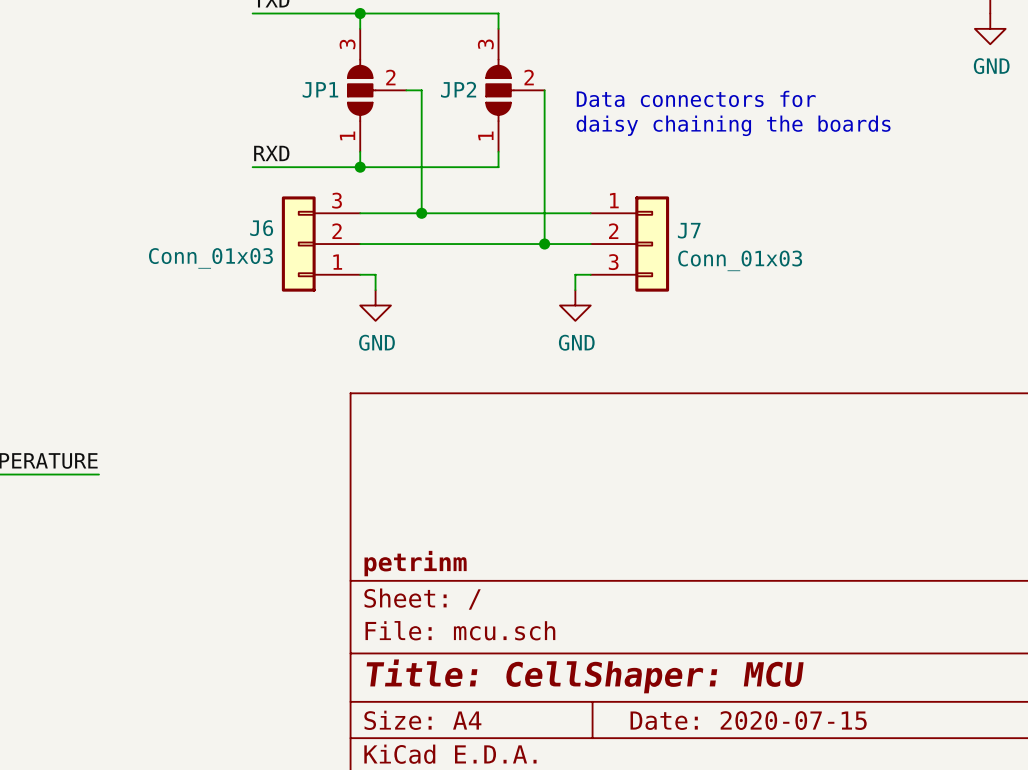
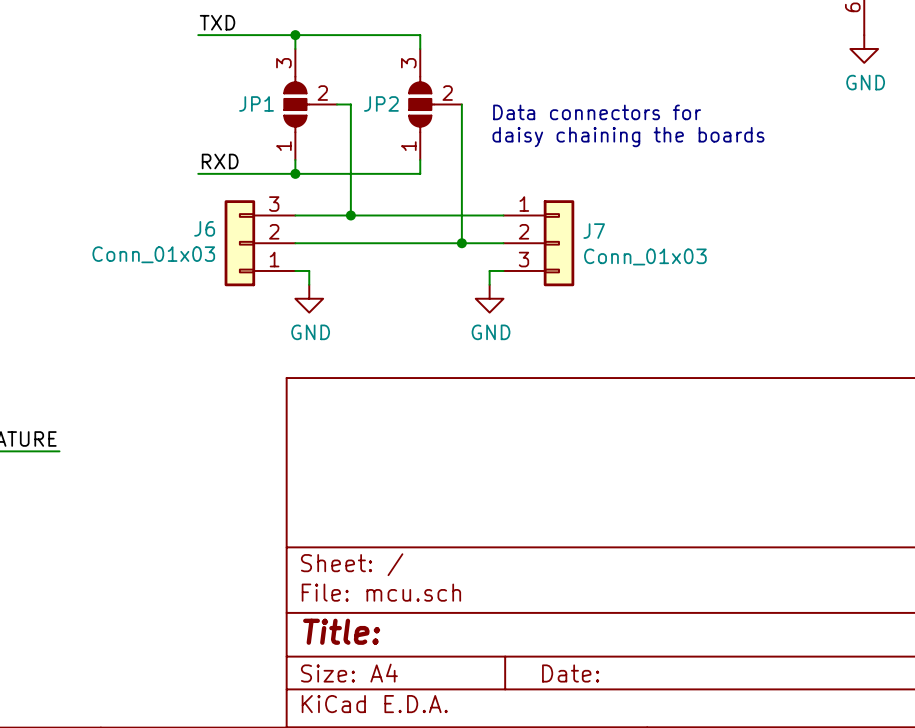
title block: petrinm (415, 563) -> none
title block: Title: CellShaper: MCU (585, 676) -> Title: (341, 631)
title block: Date: 2020-07-15 (748, 720) -> Date: (570, 673)

